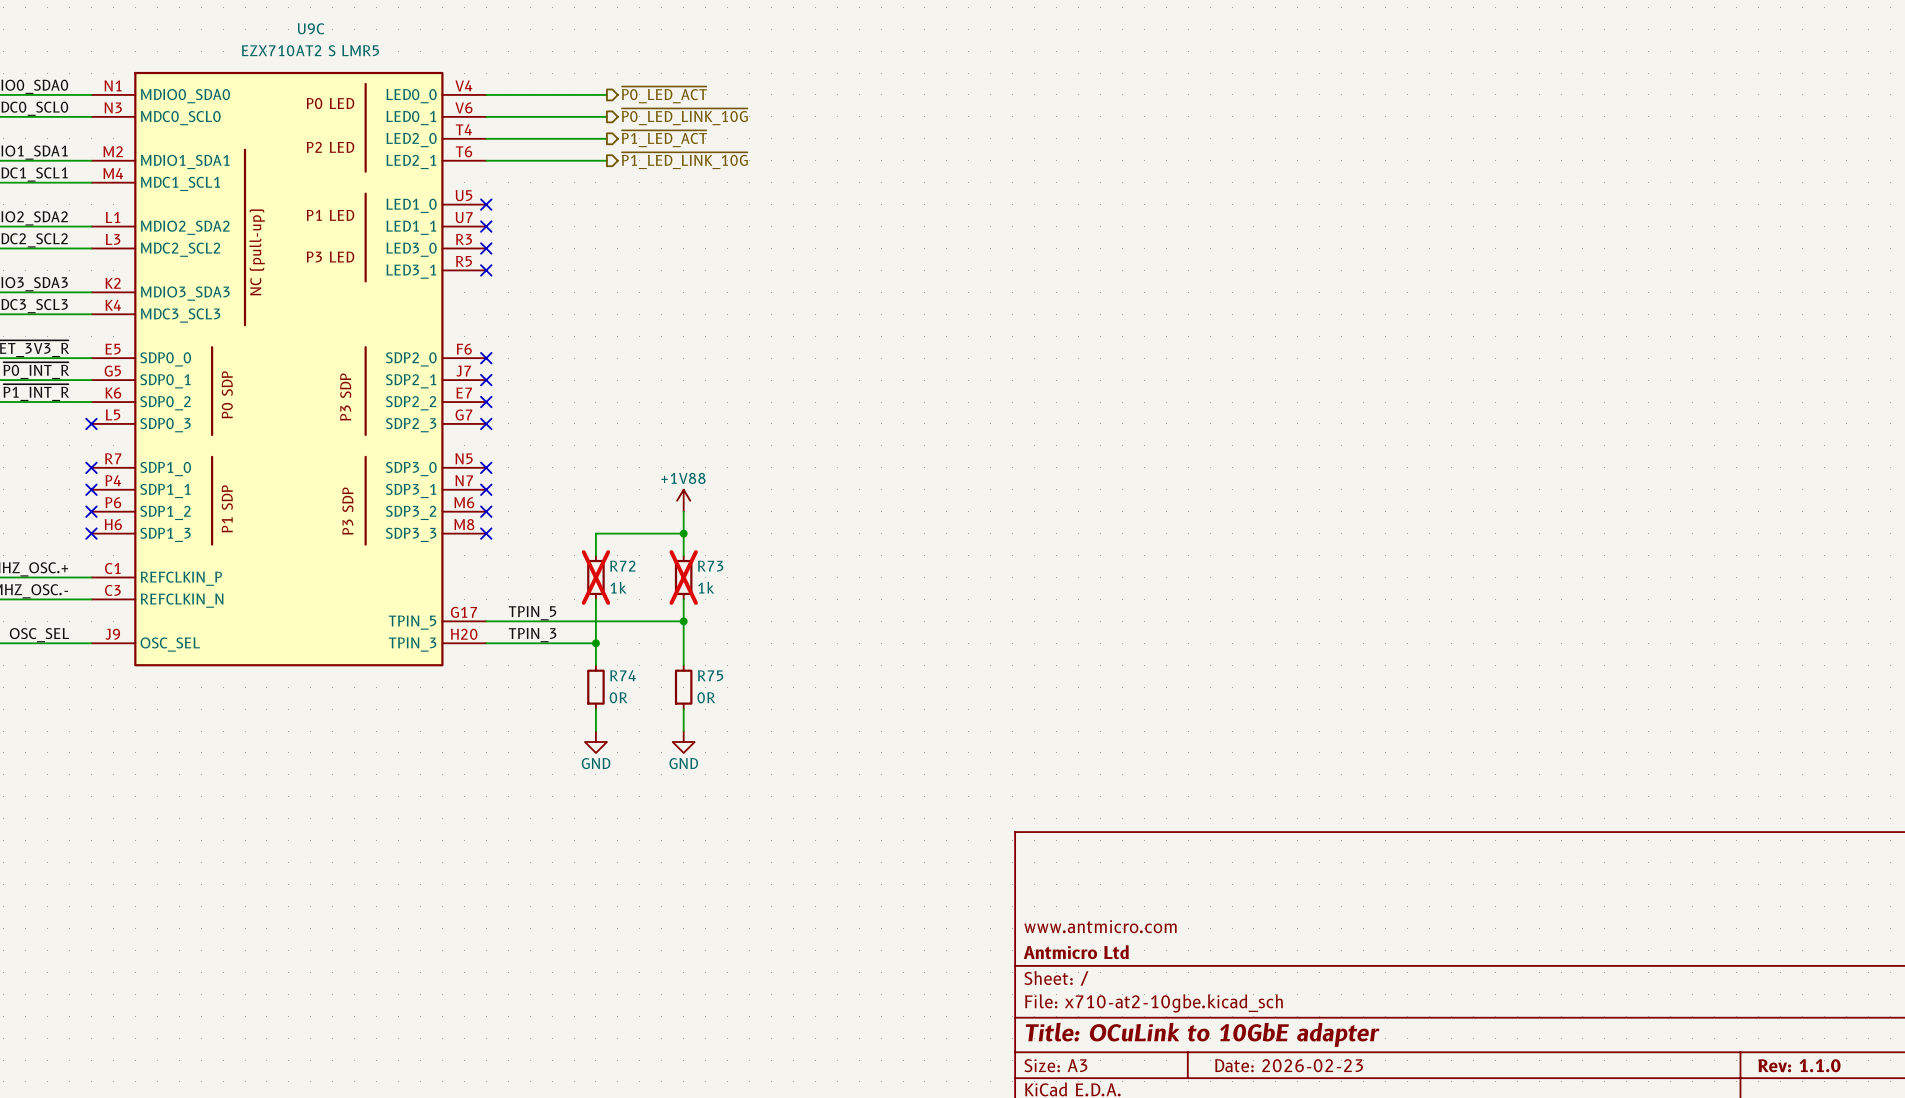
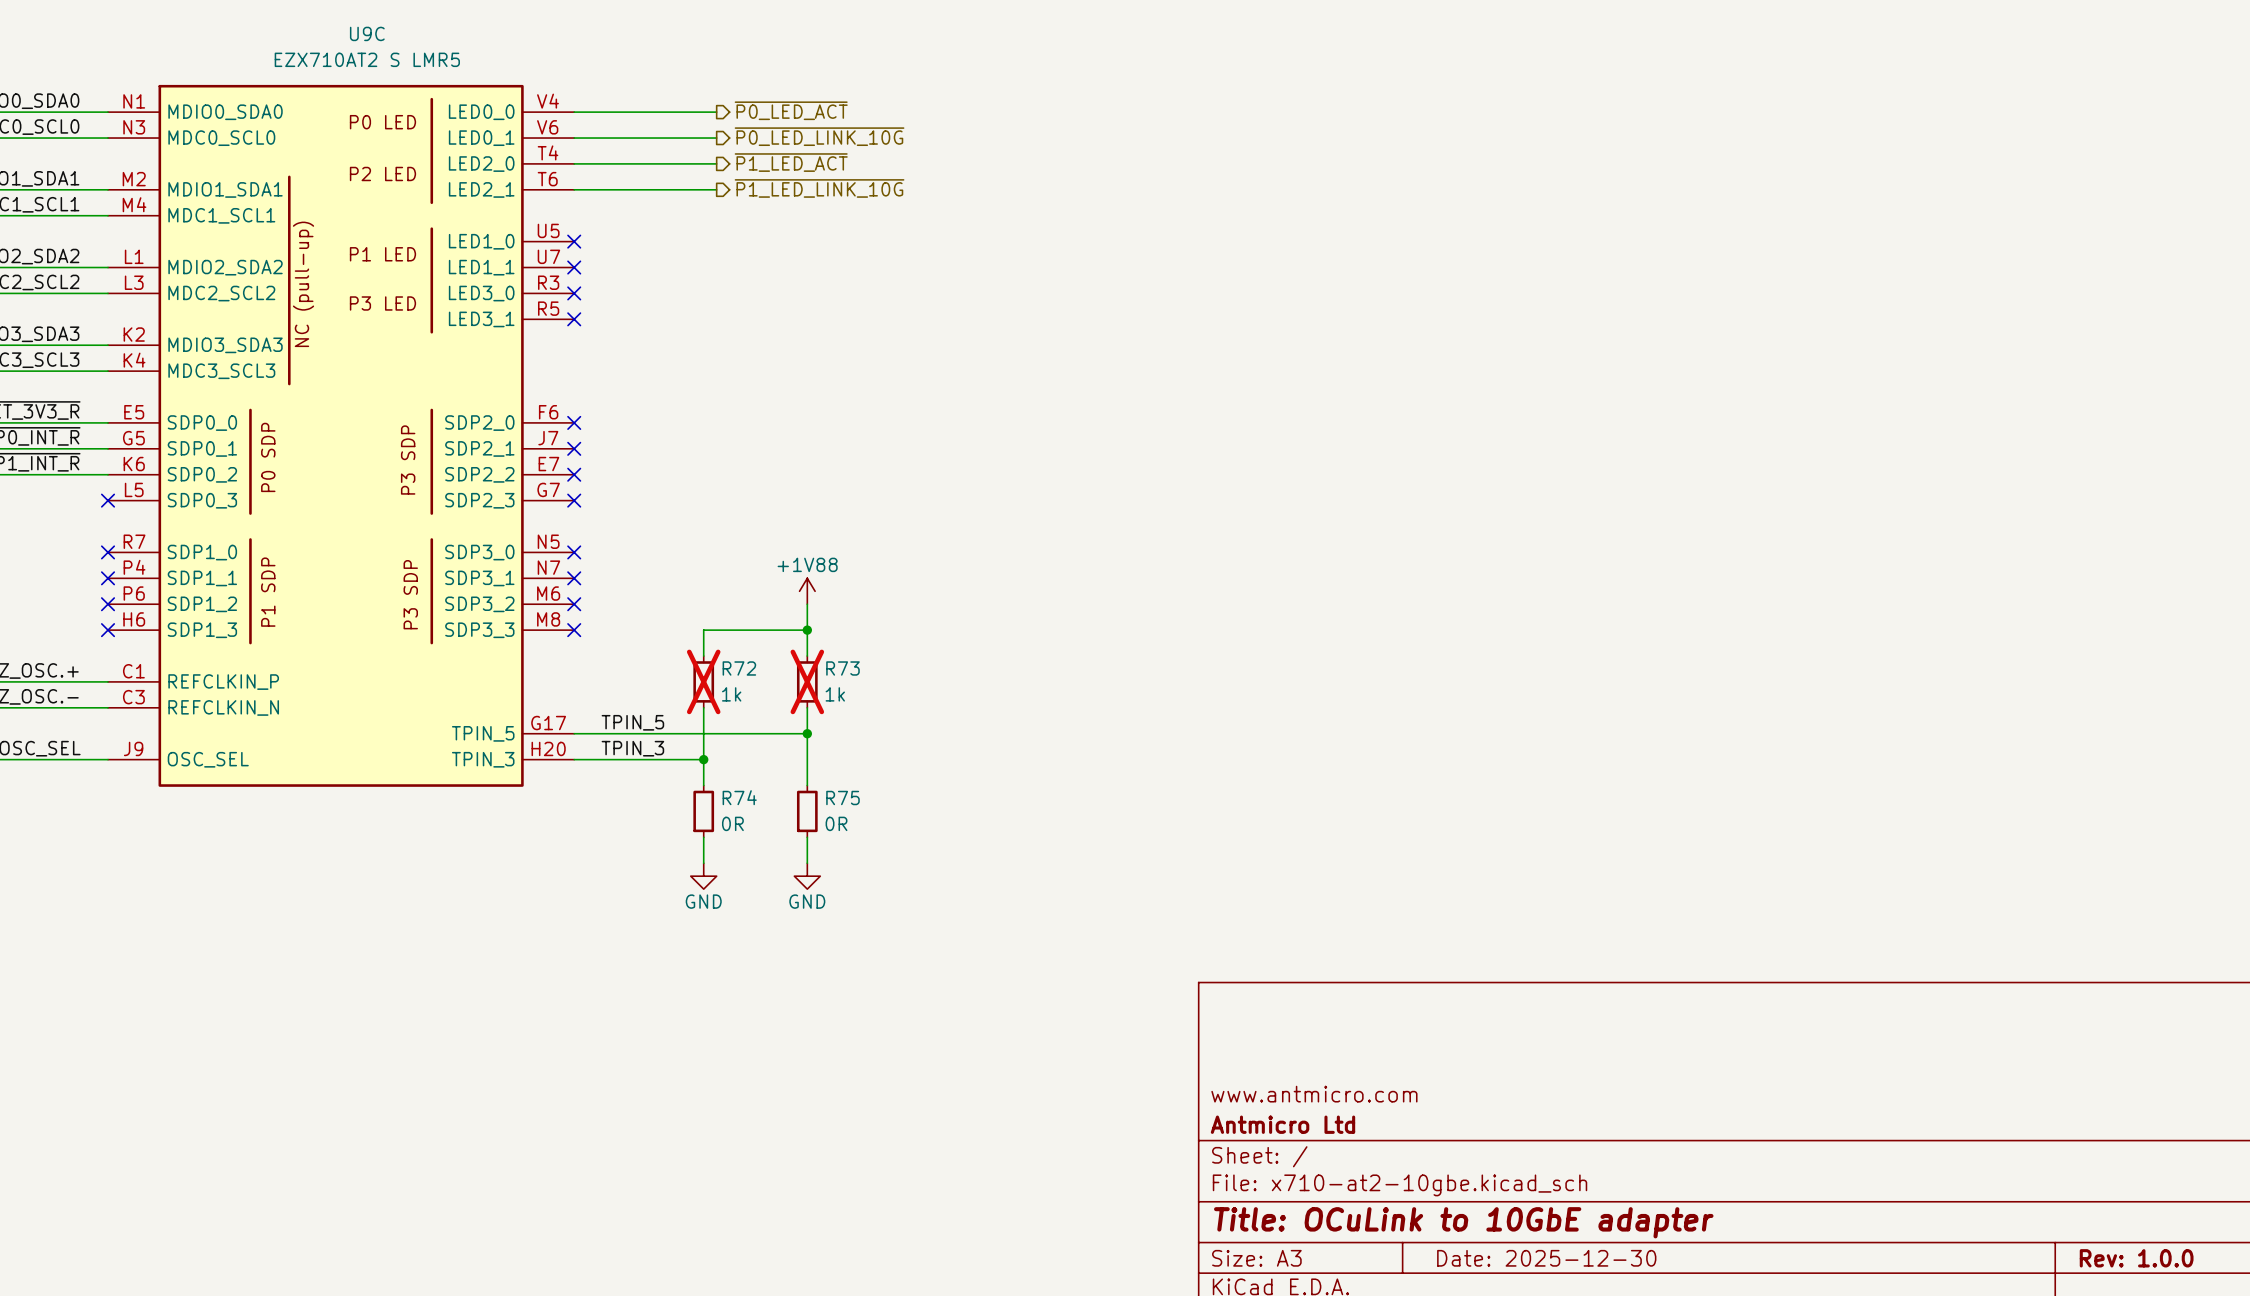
title block: Date: 2026-02-23 (1289, 1065) -> Date: 2025-12-30 (1546, 1258)
title block: Rev: 1.1.0 (1799, 1065) -> Rev: 1.0.0 (2136, 1258)

